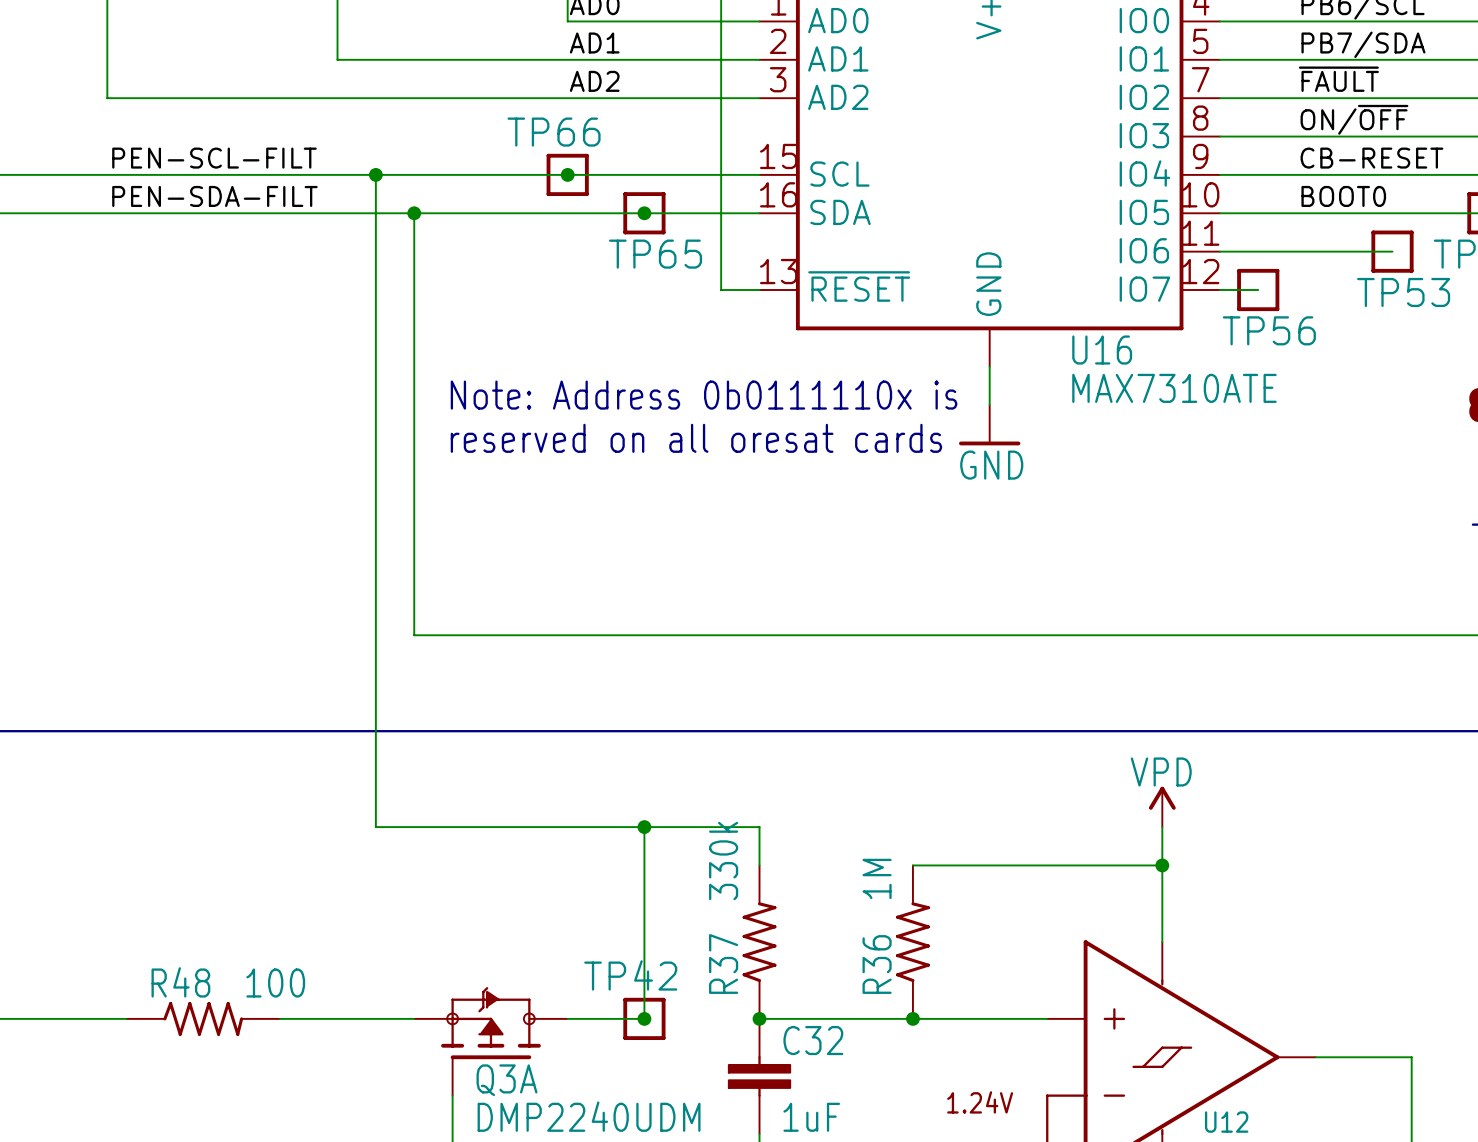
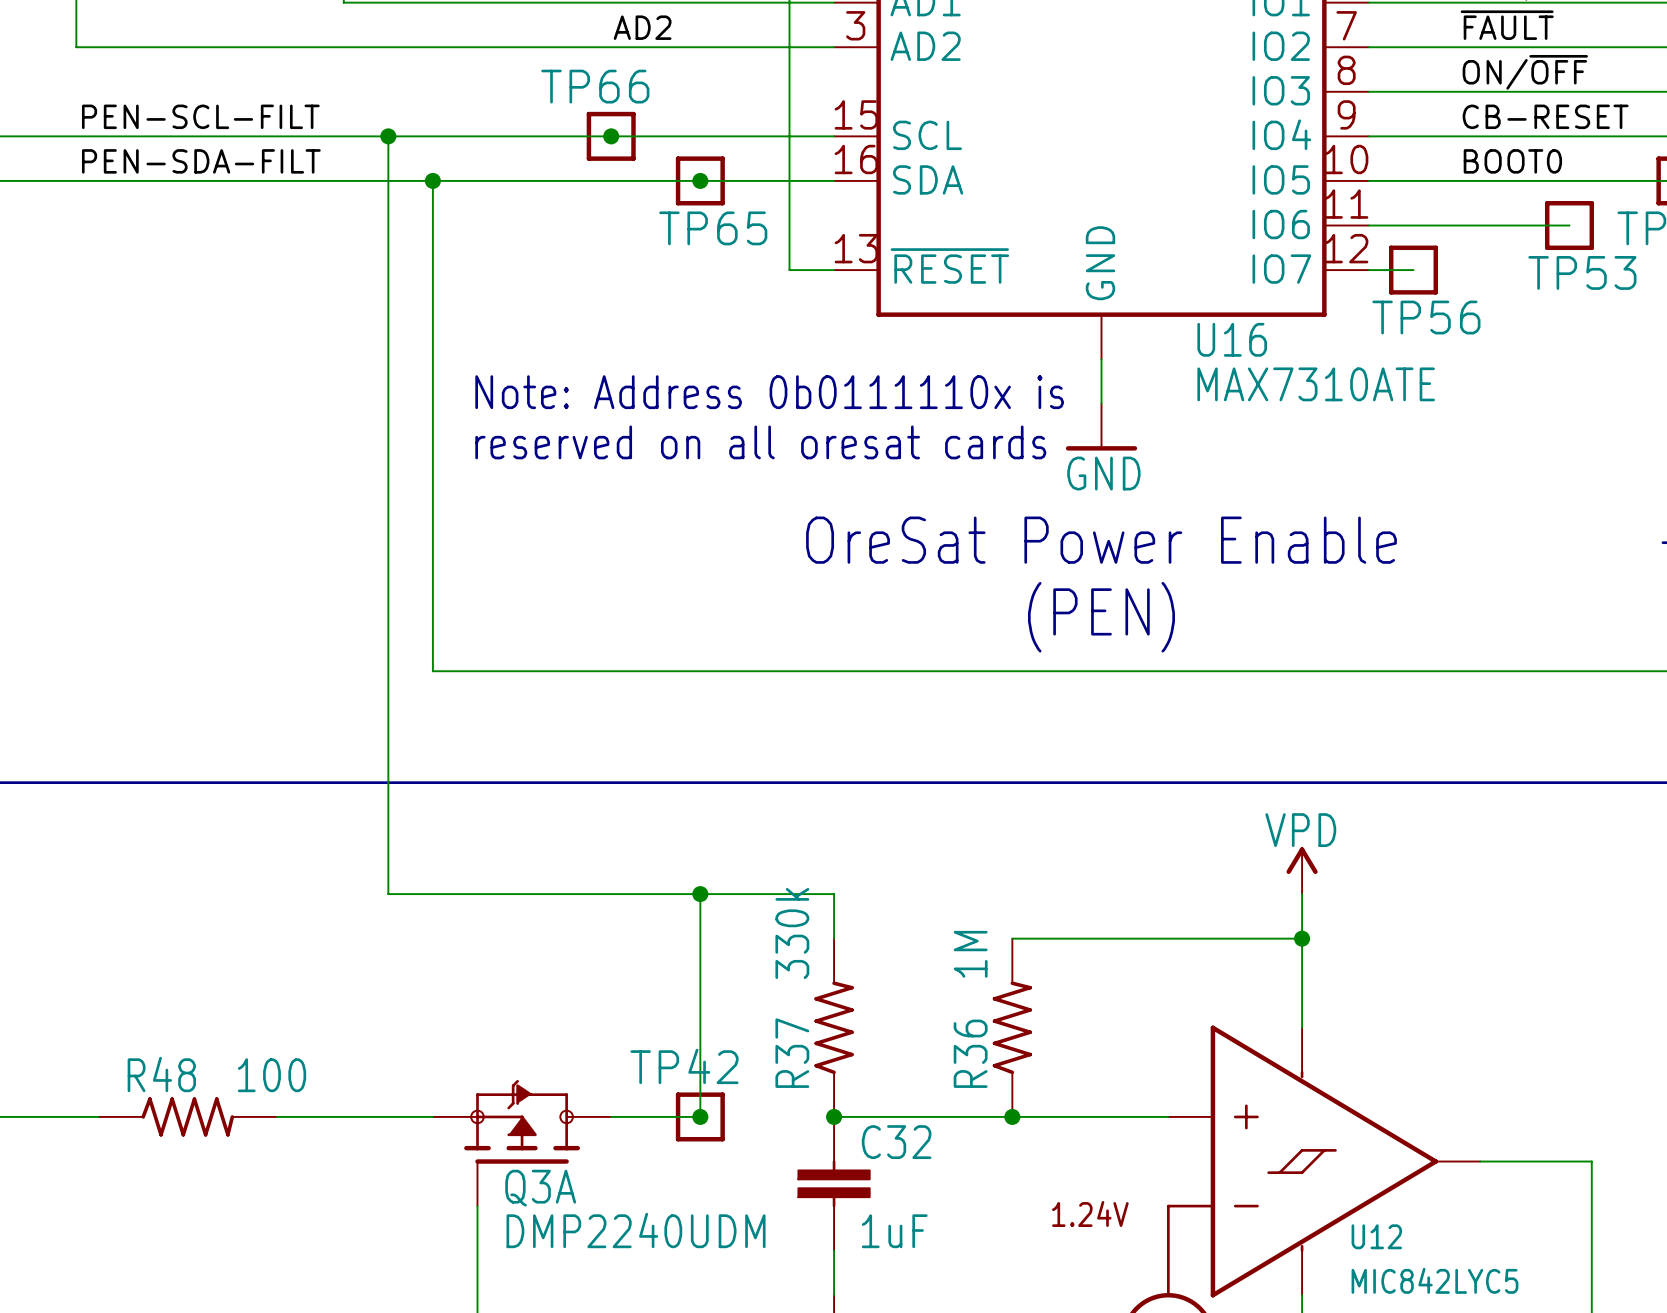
text: none -> OreSat Power Enable (1101, 540)
text: none -> (PEN) (1101, 617)

